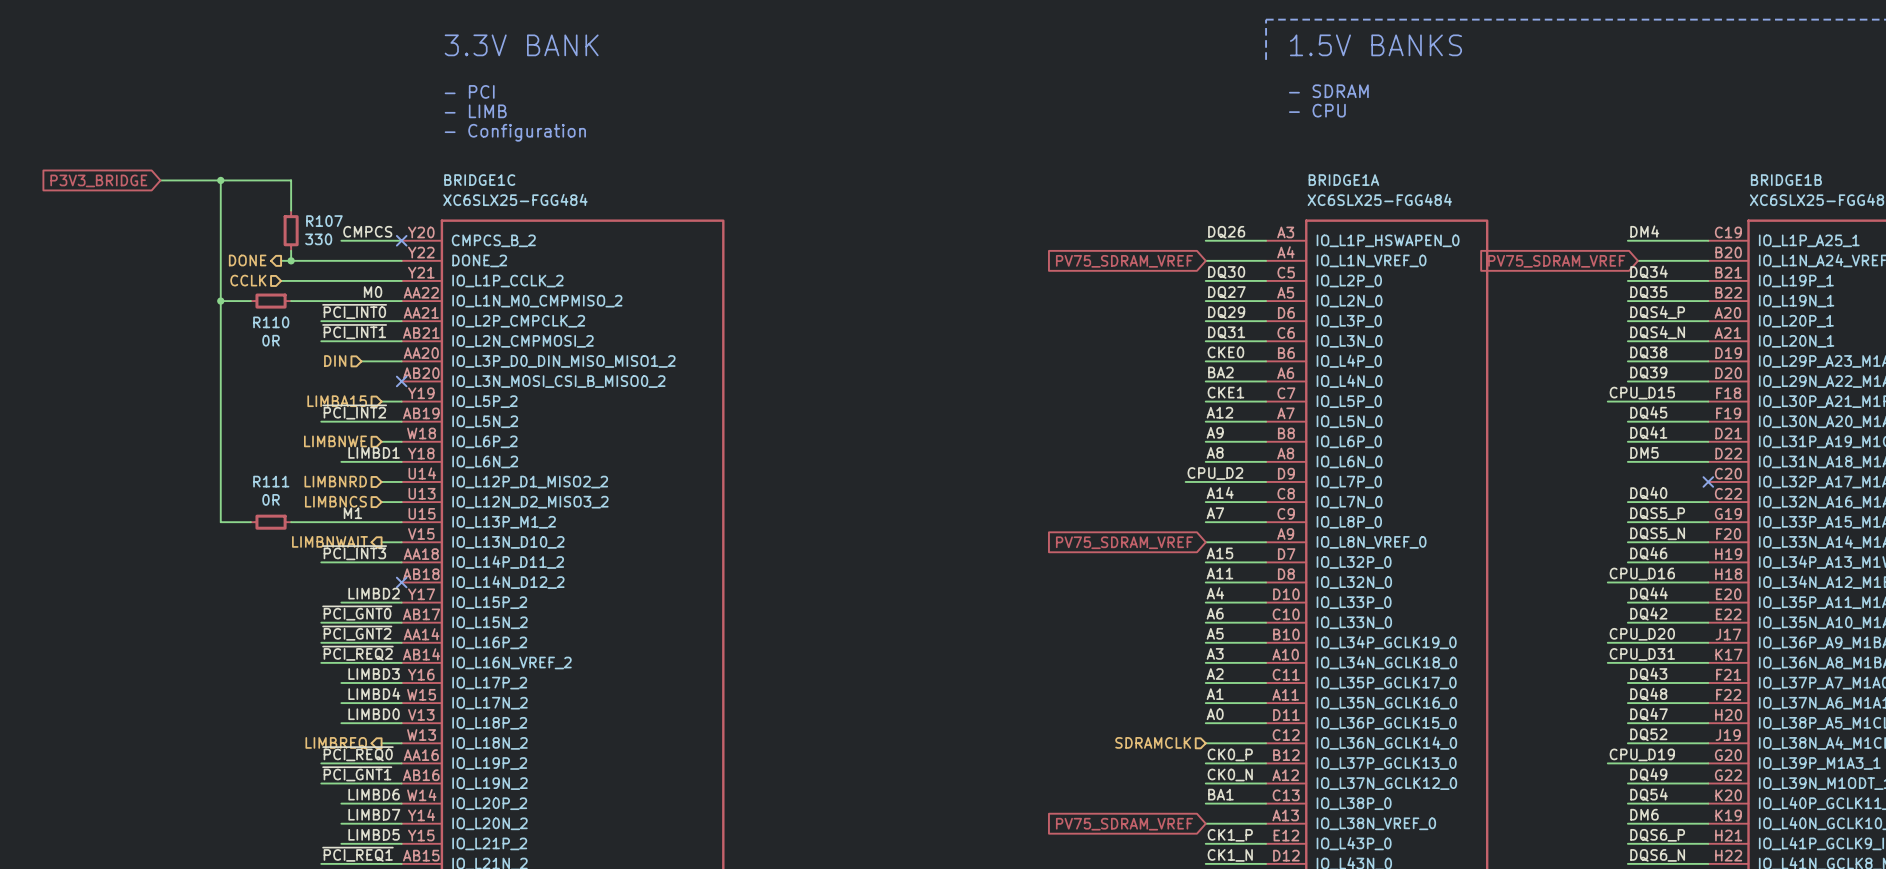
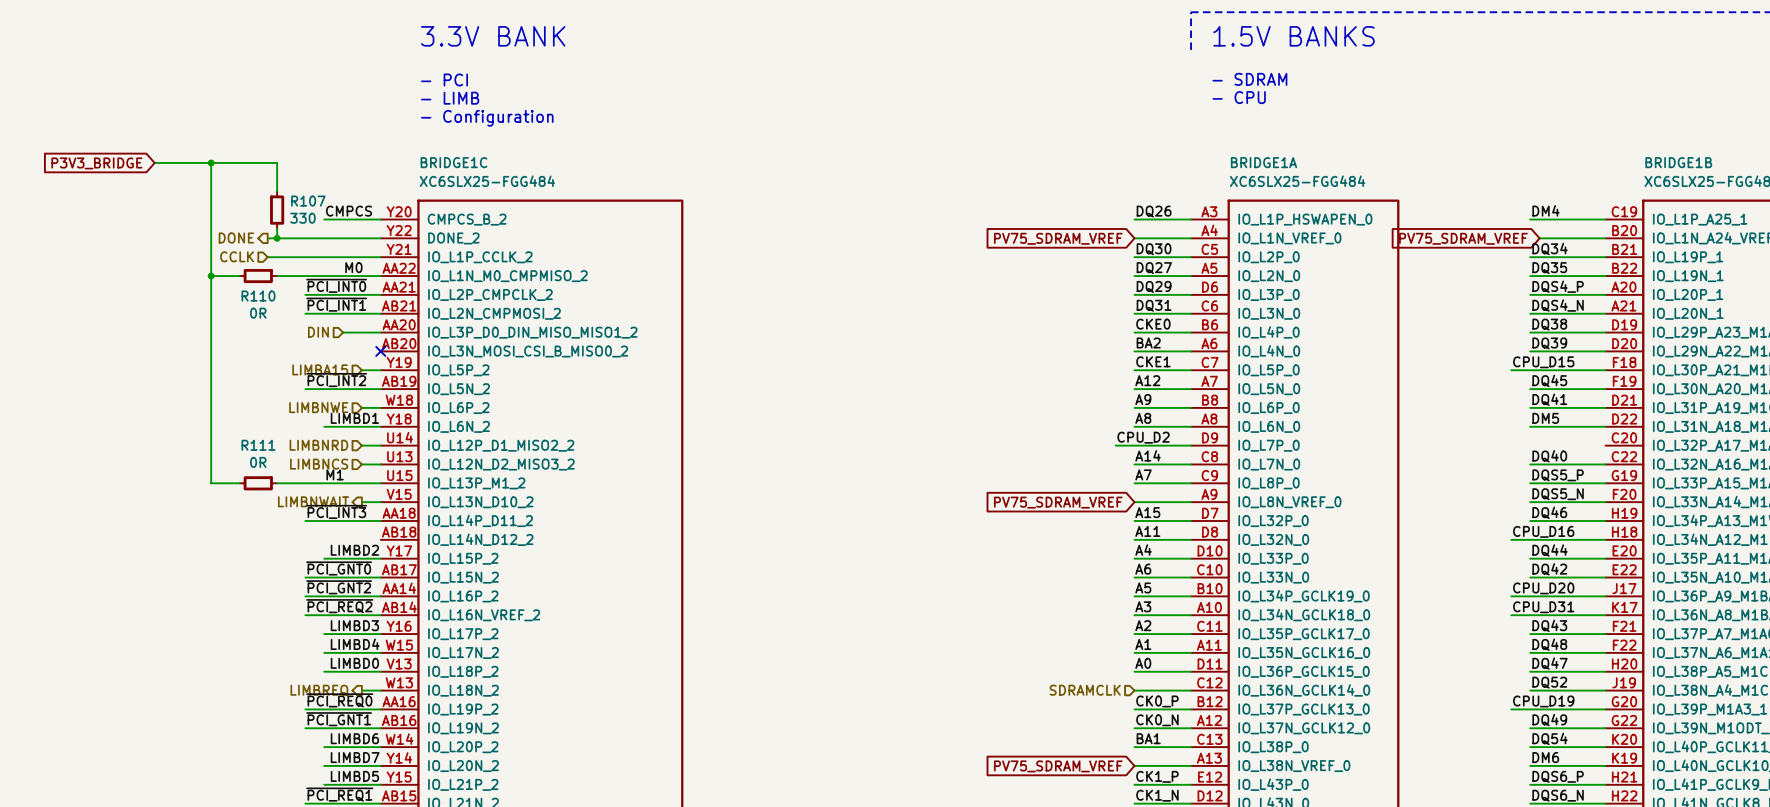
no-connect mark: (401, 240) -> none
no-connect mark: (1708, 481) -> none
no-connect mark: (401, 582) -> none

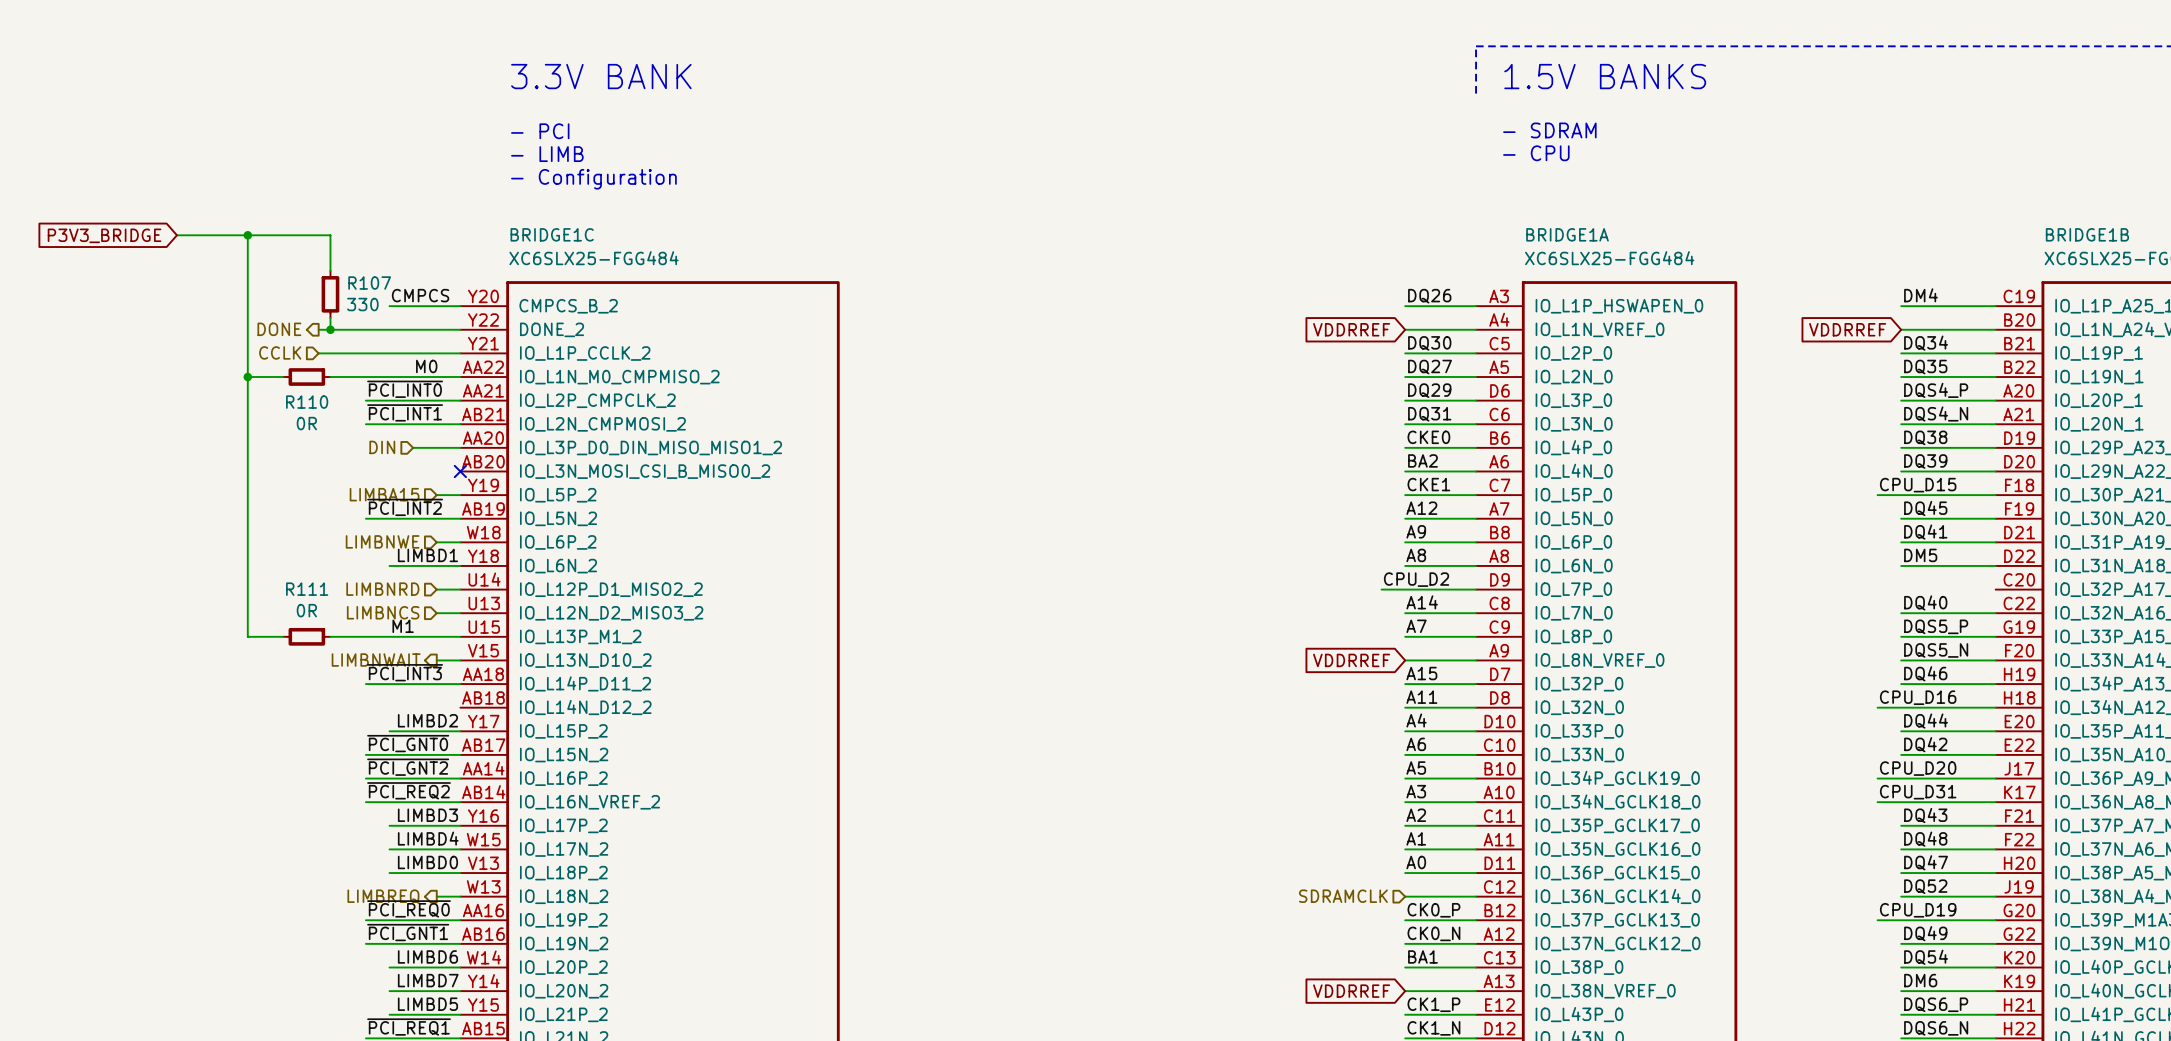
global label: PV75_SDRAM_VREF (1058, 238) -> VDDRREF (1351, 329)
global label: PV75_SDRAM_VREF (1463, 238) -> none
global label: none -> VDDRREF (1847, 329)
wire: none -> (1901, 329) (1913, 329)
global label: PV75_SDRAM_VREF (1058, 502) -> VDDRREF (1351, 660)
global label: PV75_SDRAM_VREF (1058, 766) -> VDDRREF (1351, 991)

